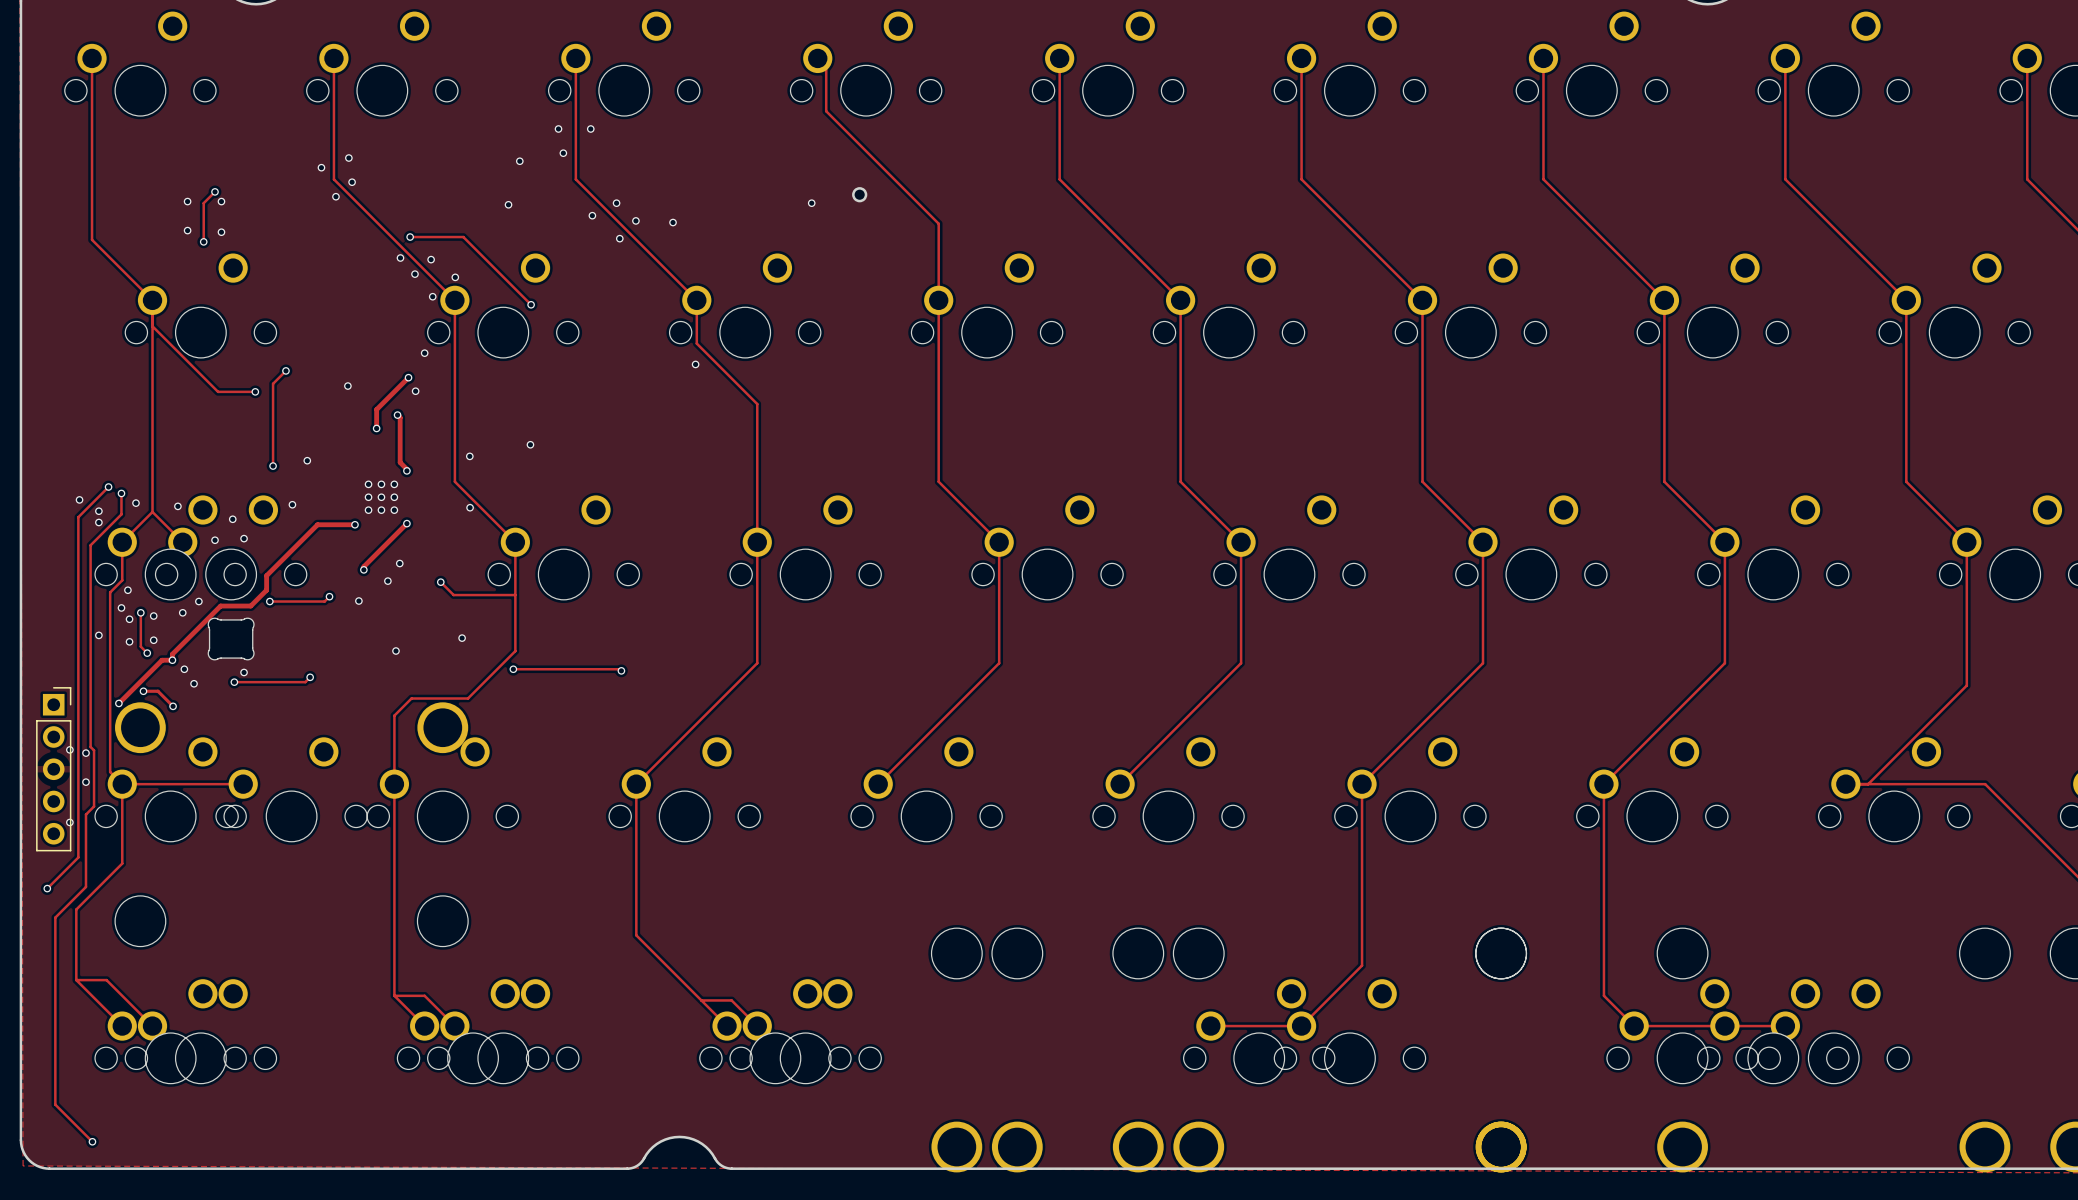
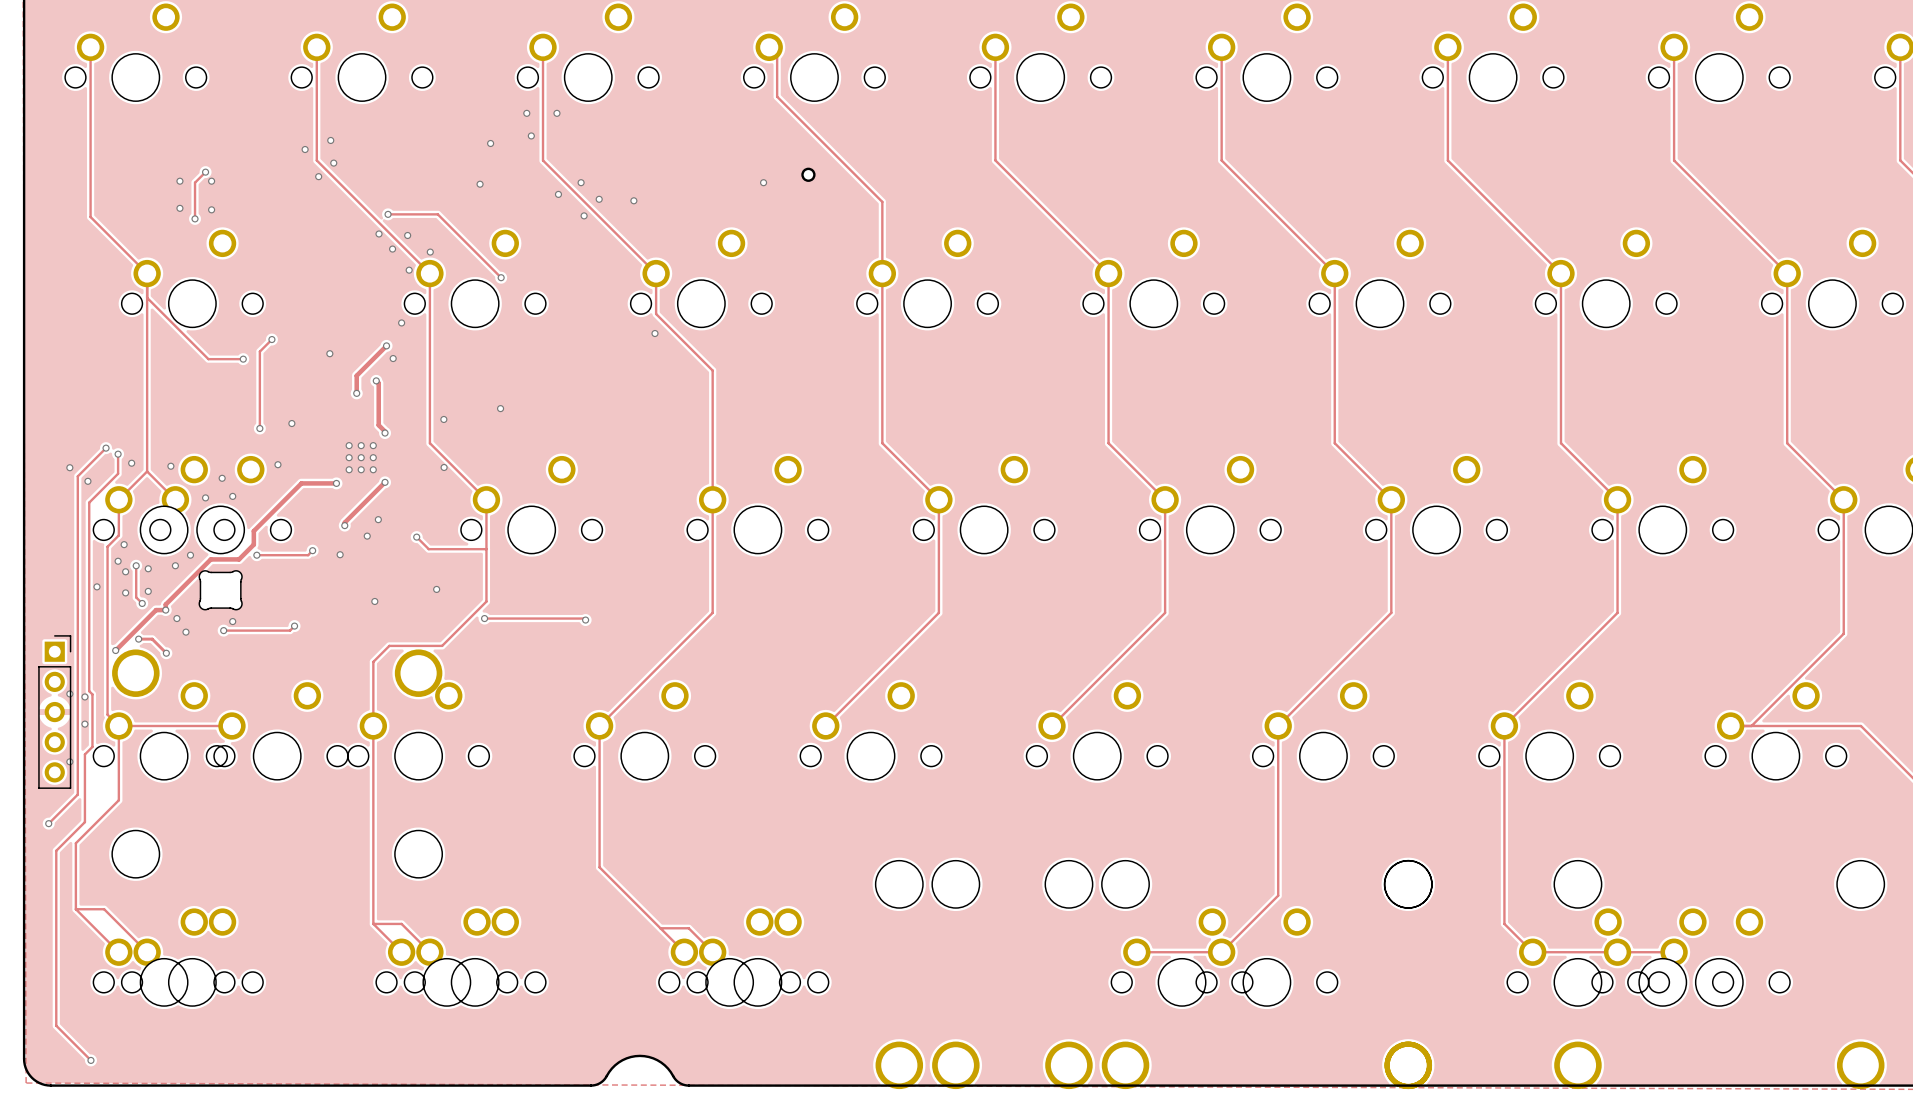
via: (79, 499) -> none
via: none -> (69, 467)
via: (98, 511) -> none
via: none -> (87, 481)
via: (98, 522) -> none

